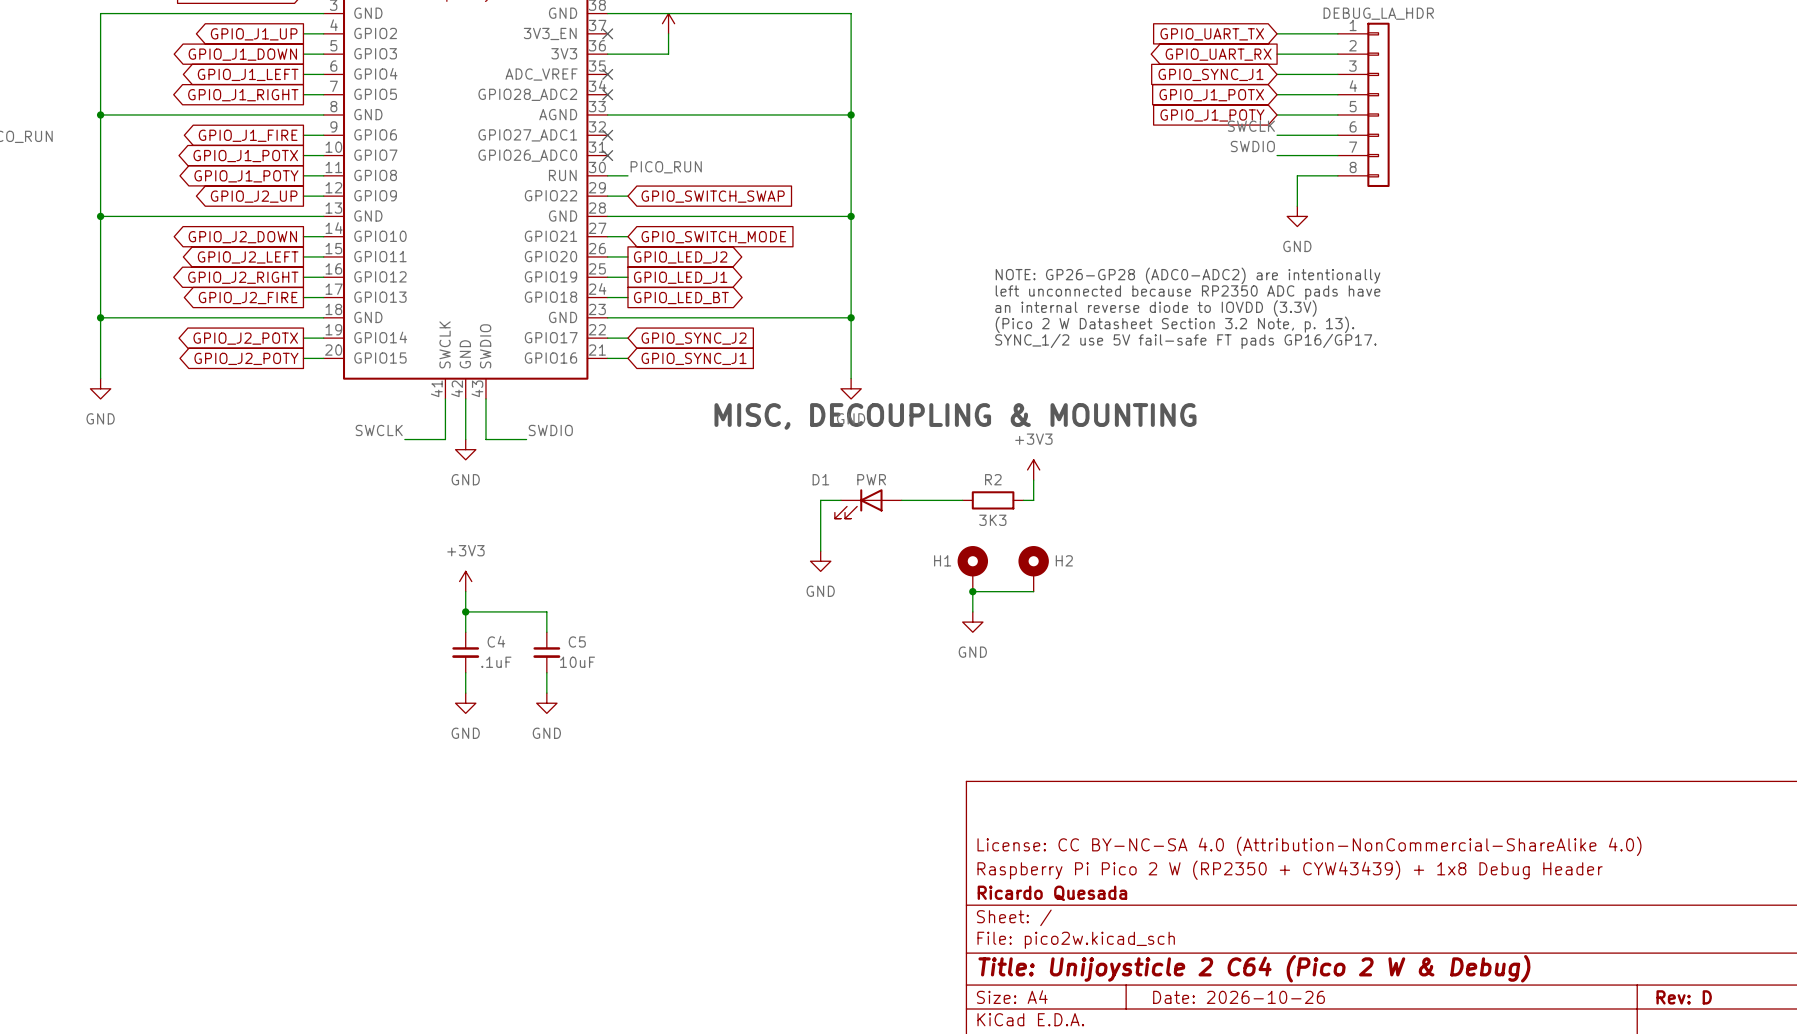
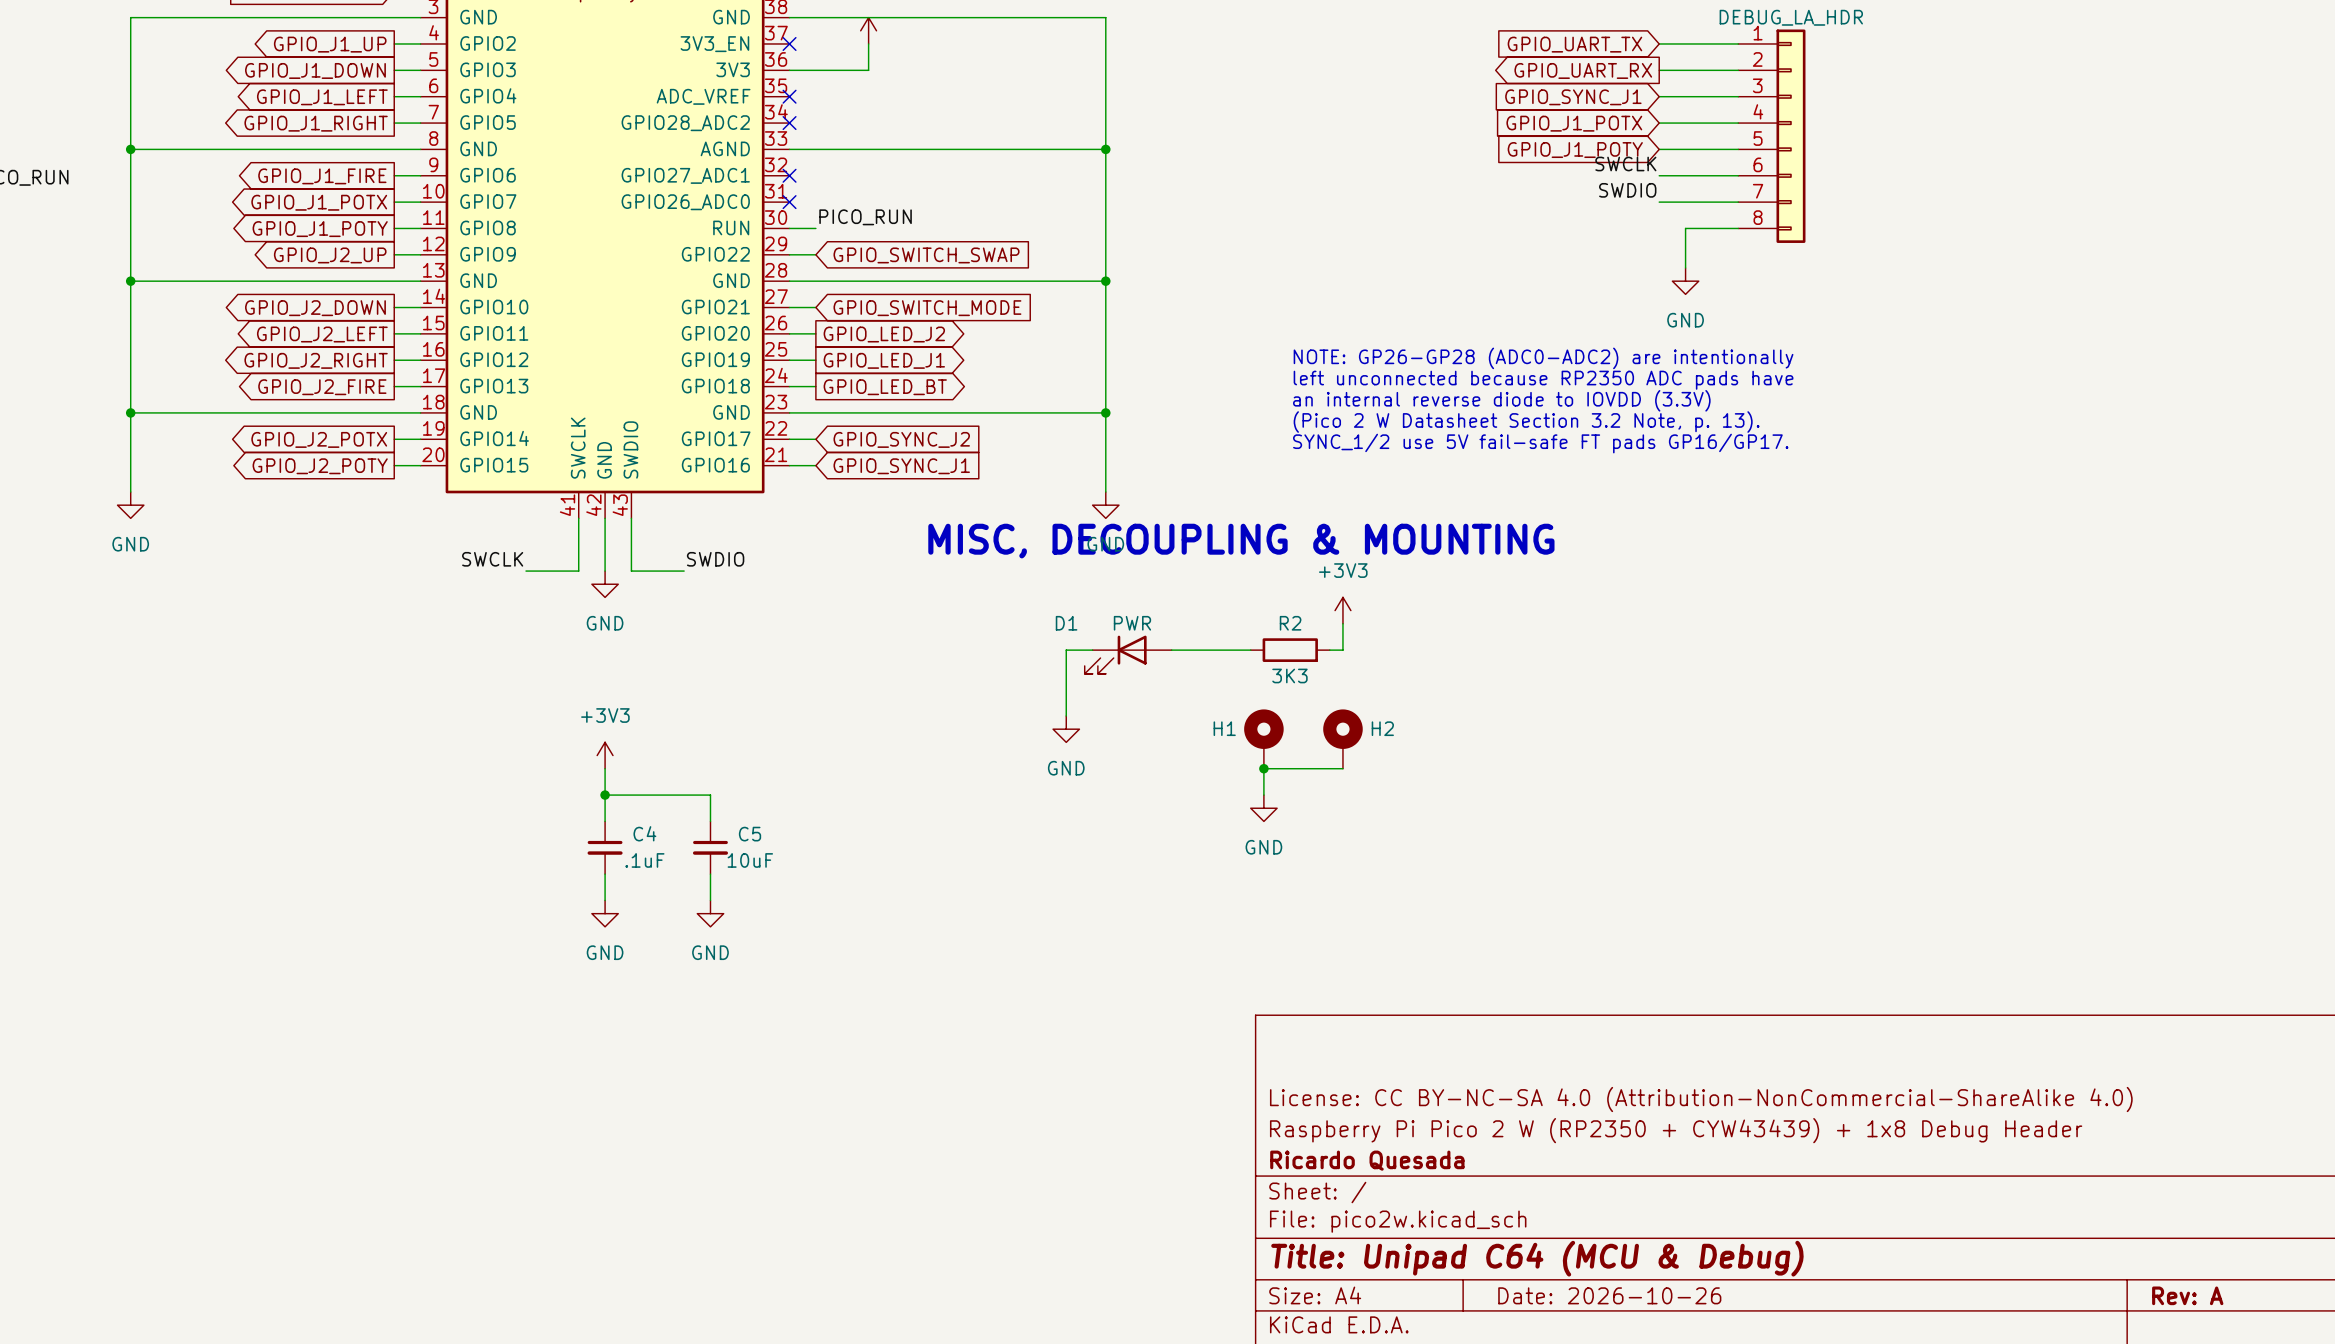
title block: Title: Unijoysticle 2 C64 (Pico 2 W & Debug) (1254, 968) -> Title: Unipad C64 (MCU & Debug) (1537, 1258)
title block: Rev: D (1684, 997) -> Rev: A (2187, 1295)

